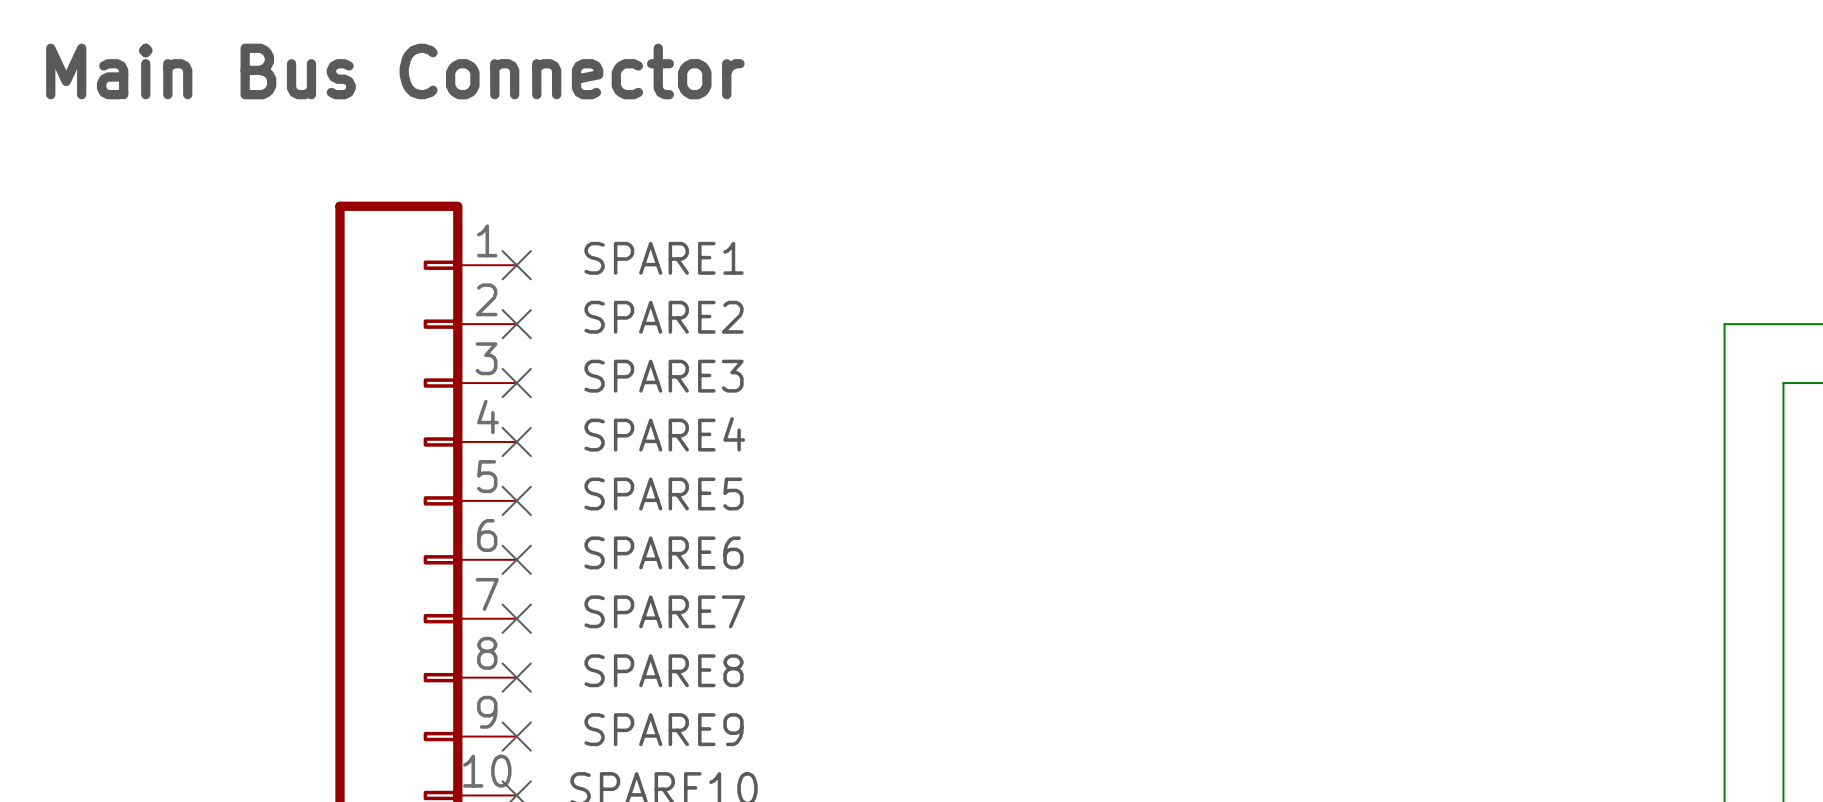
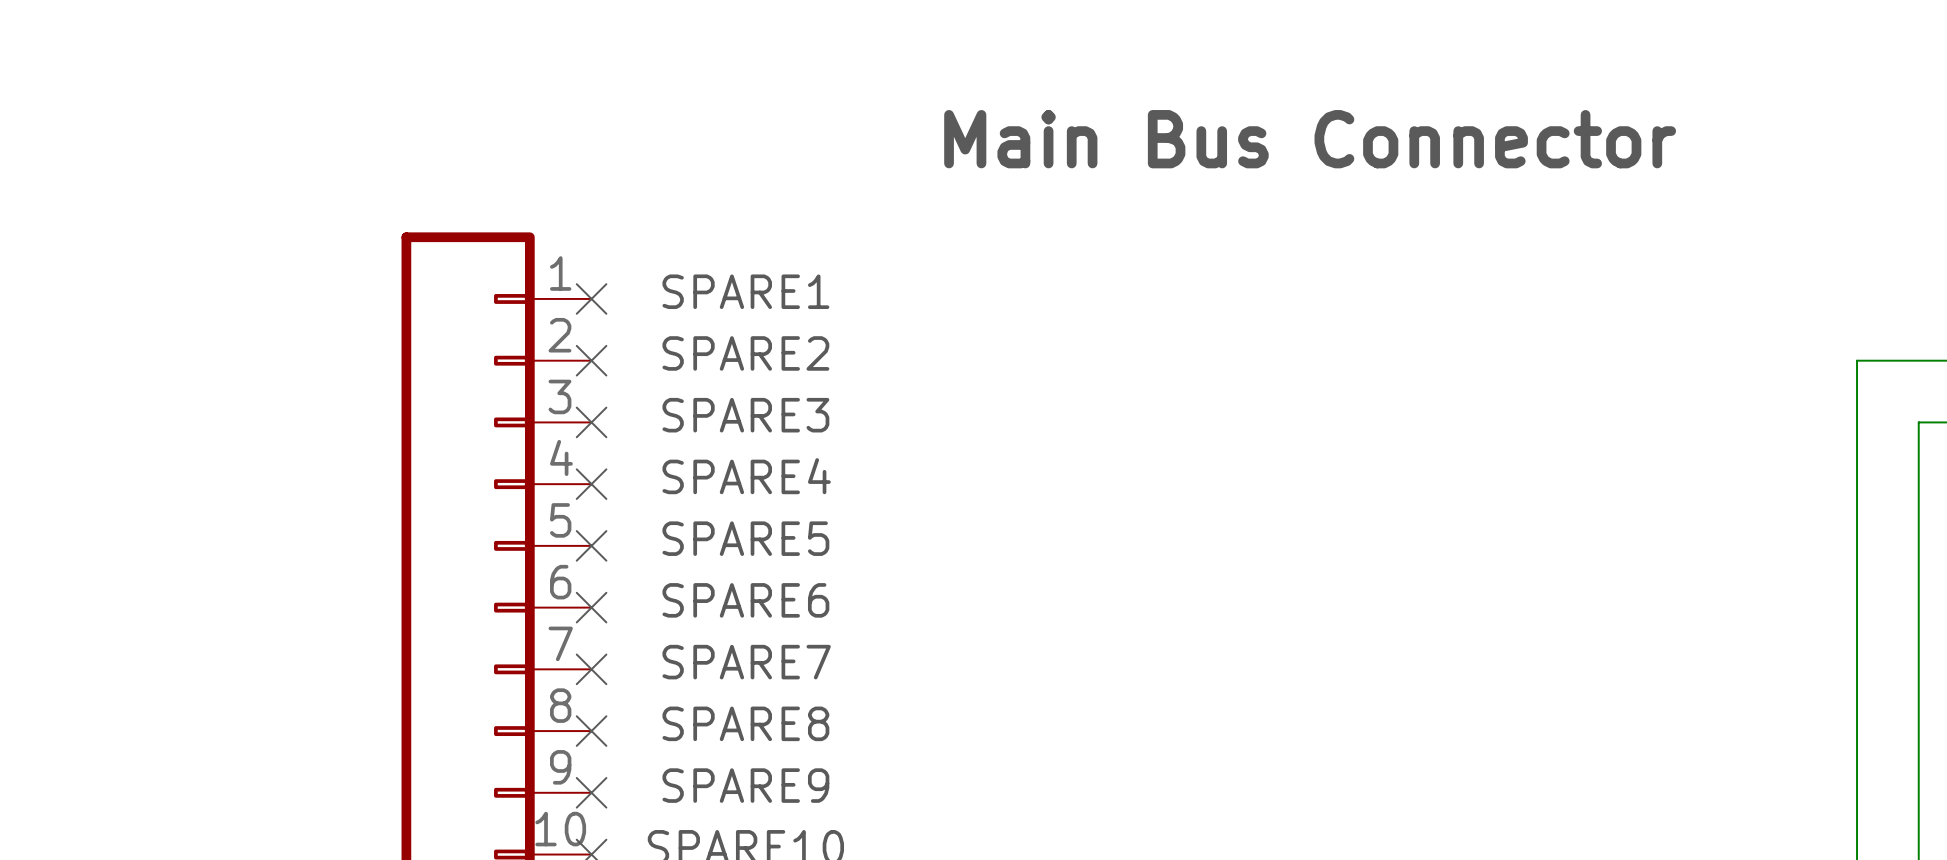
text: Main Bus Connector (395, 71) -> none
text: none -> Main Bus Connector (1310, 139)

